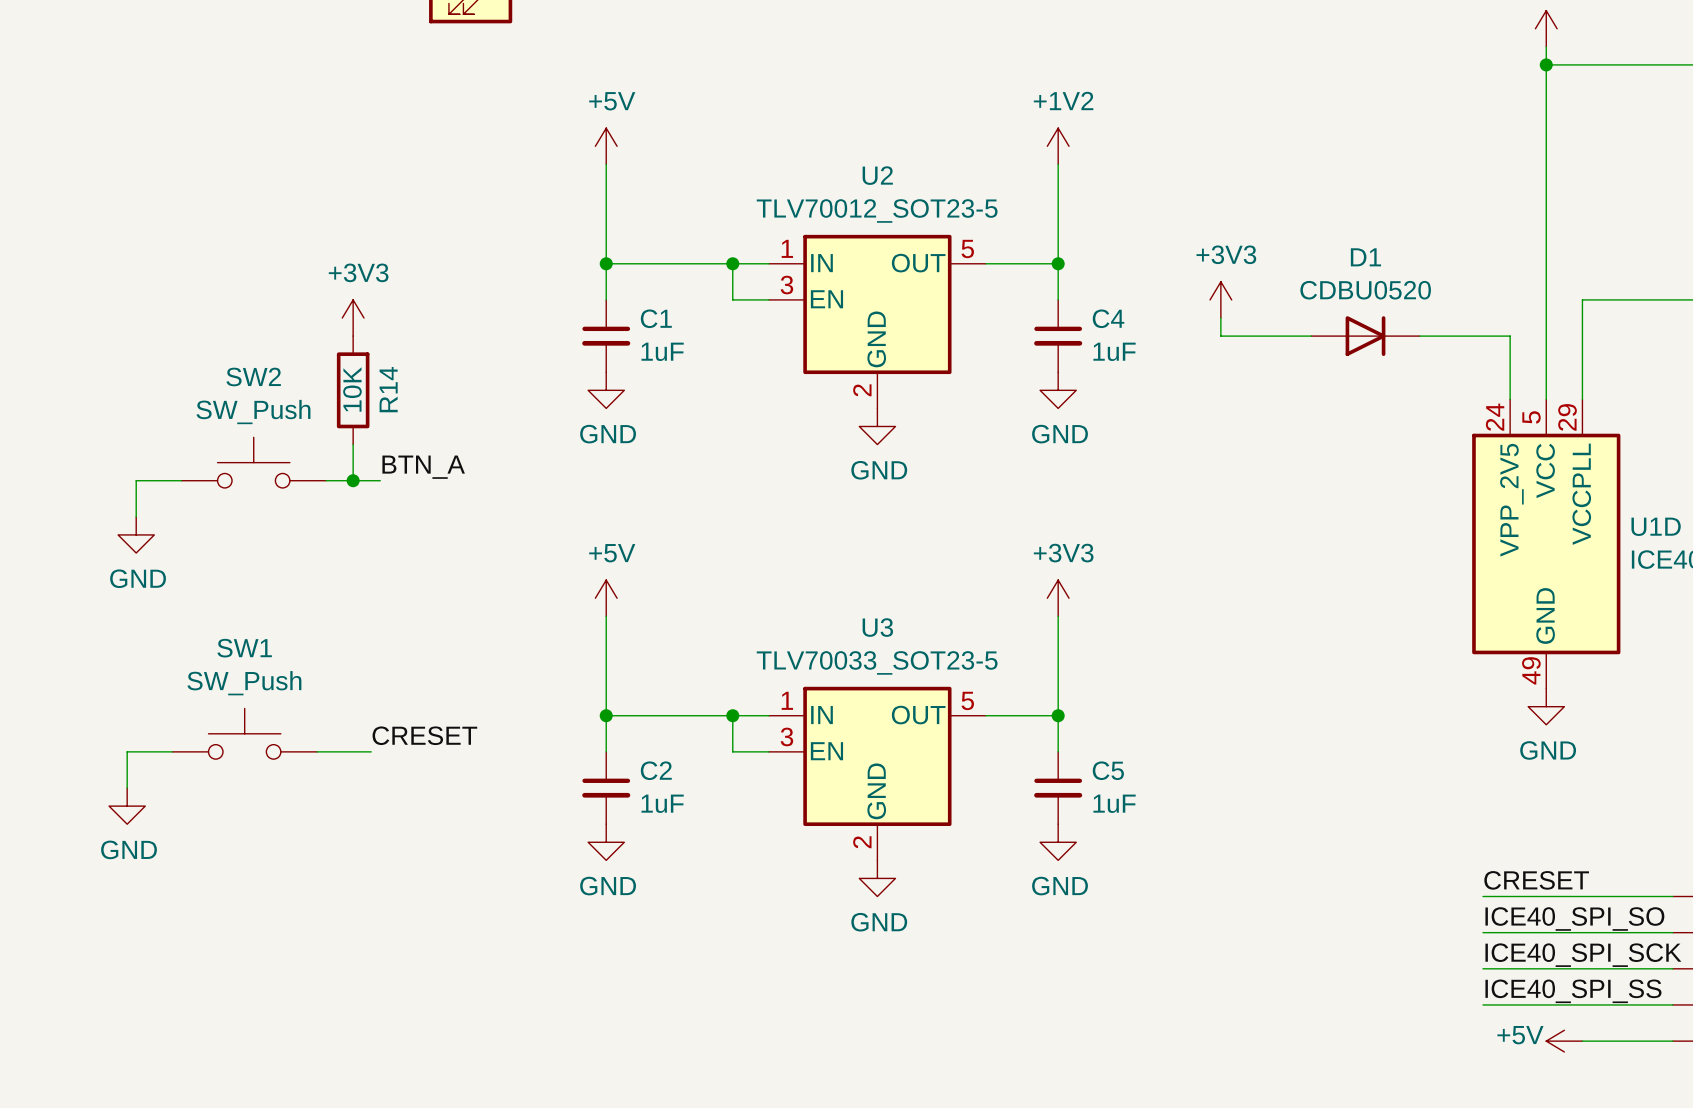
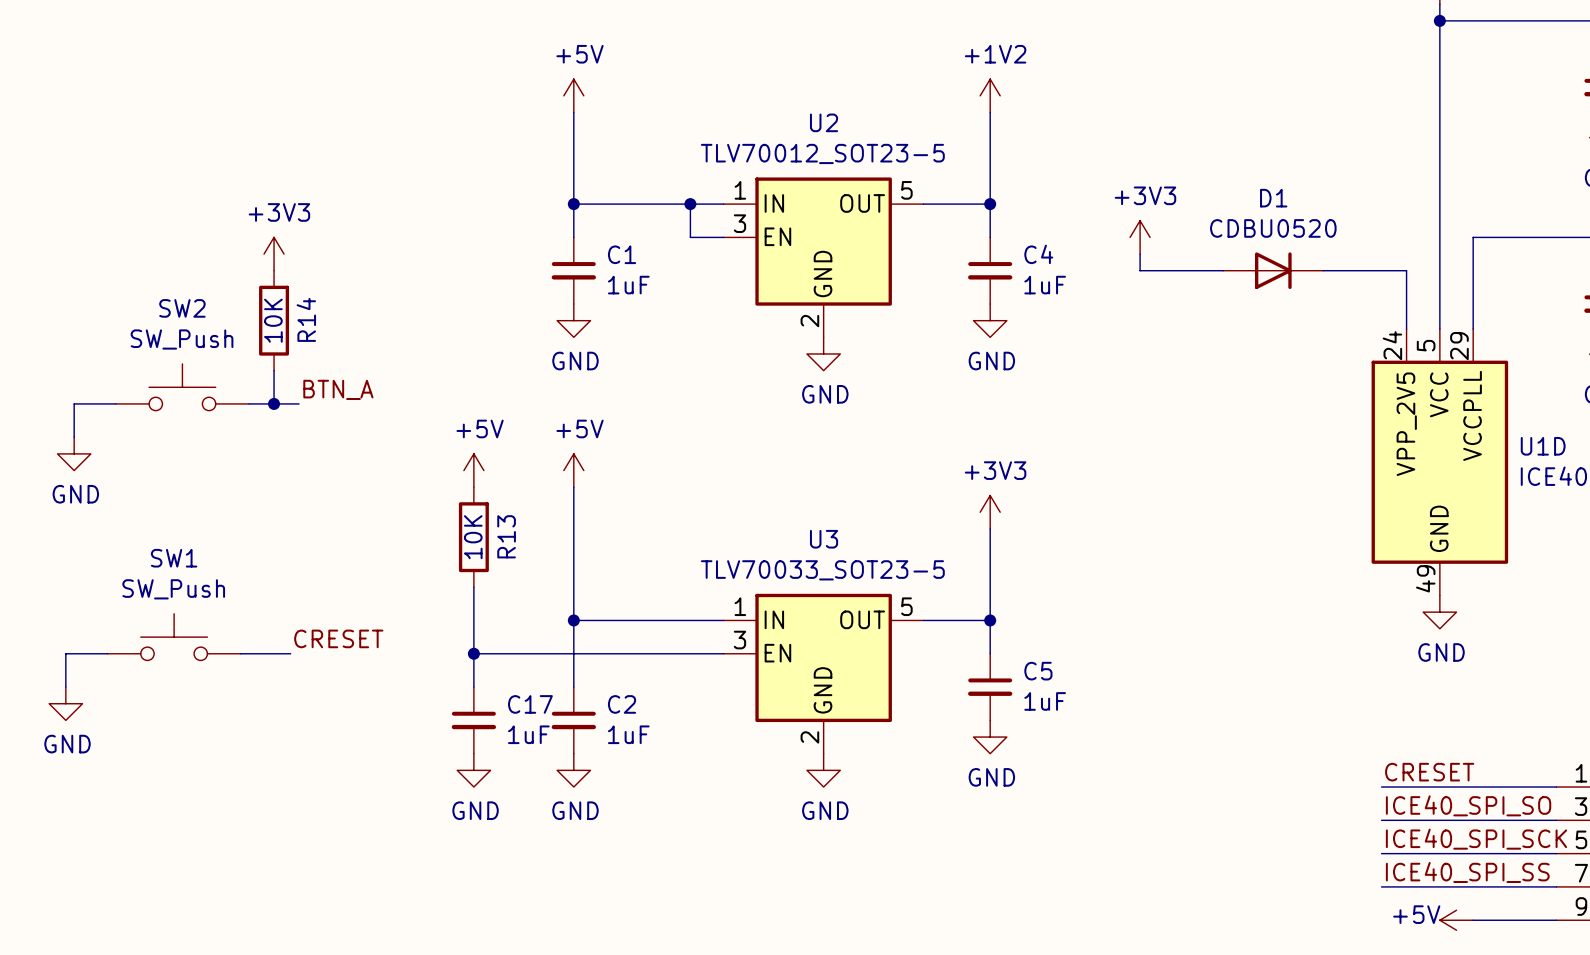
power symbol position: +3V3 (353, 318) -> +3V3 (274, 254)
R14 position: (353, 390) -> (274, 320)
wire: (353, 444) (353, 480) -> (274, 370) (274, 403)
SW2 position: (253, 462) -> (182, 387)
label position: BTN_A (423, 467) -> BTN_A (338, 389)
wire: (181, 480) (136, 480) (136, 516) -> (115, 403) (74, 403) (74, 437)
wire: (326, 480) (380, 480) -> (249, 403) (299, 403)
junction position: (353, 480) -> (274, 403)
power symbol position: GND (136, 534) -> GND (74, 453)
power symbol: none -> +5V (473, 470)
power symbol position: +5V (606, 598) -> +5V (573, 470)
R13: none -> 10K (473, 537)
wire: none -> (473, 587) (473, 687)
wire: (732, 715) (732, 751) -> (473, 653) (690, 653)
junction: (732, 715) -> none
SW1 position: (244, 733) -> (174, 637)
label position: CRESET (424, 735) -> CRESET (338, 638)
wire: (172, 751) (127, 751) (127, 788) -> (107, 653) (65, 653) (65, 687)
wire: (316, 751) (371, 751) -> (240, 653) (290, 653)
junction: none -> (473, 653)
C2 position: (606, 788) -> (573, 720)
power symbol position: GND (127, 806) -> GND (65, 703)
C17: none -> 1uF (473, 720)
power symbol position: GND (606, 842) -> GND (573, 770)
power symbol: none -> GND (473, 770)

